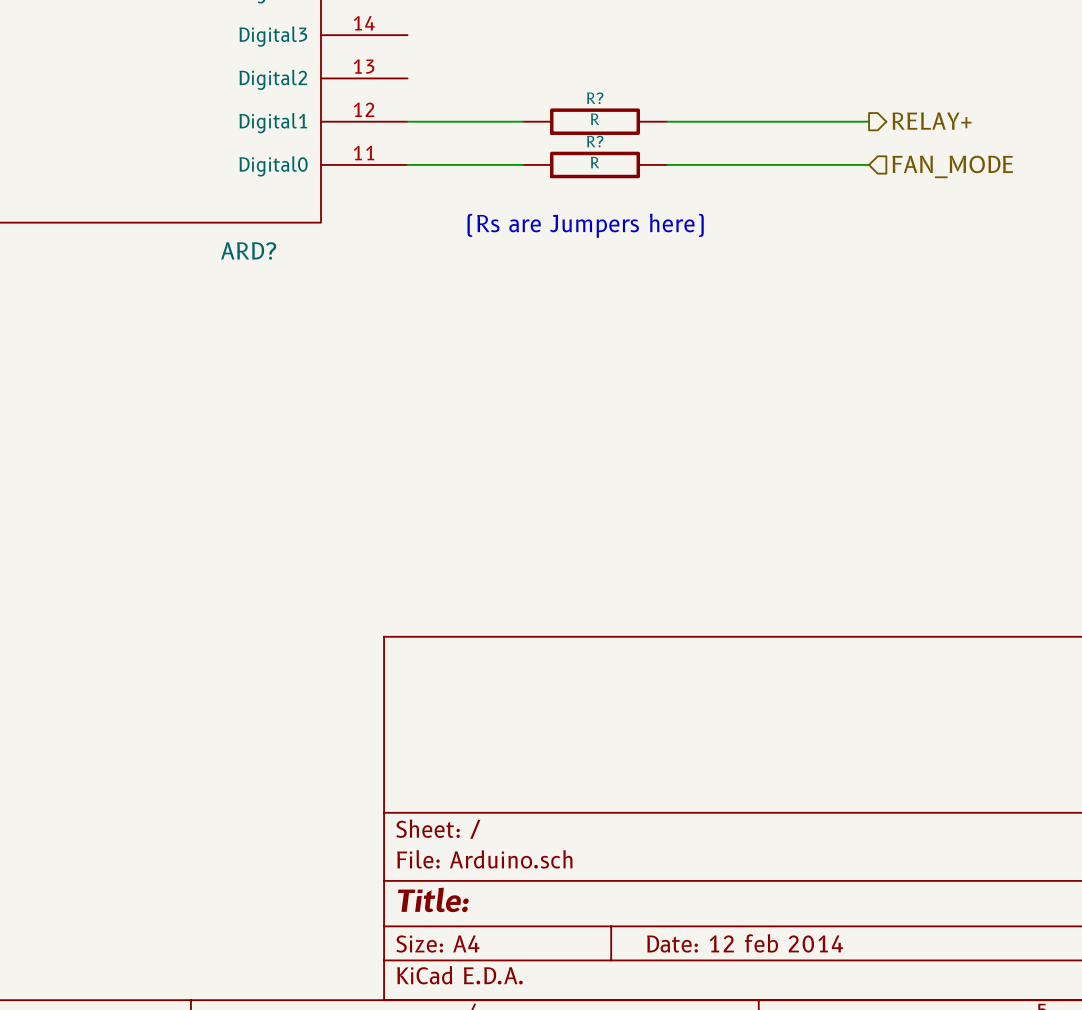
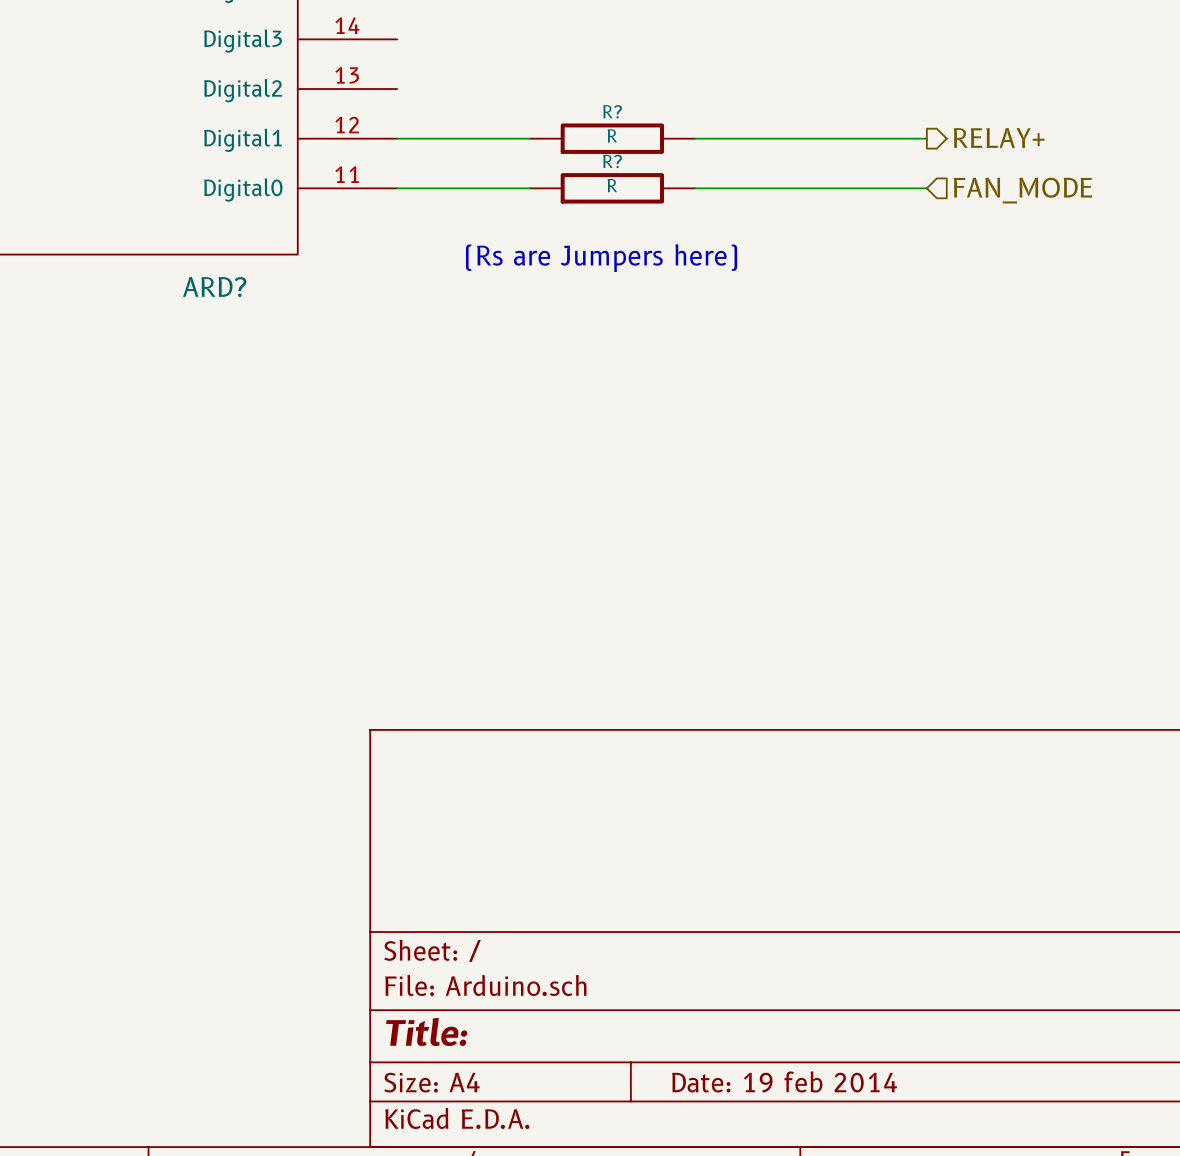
title block: Date: 12 feb 2014 (745, 943) -> Date: 19 feb 2014 (784, 1081)

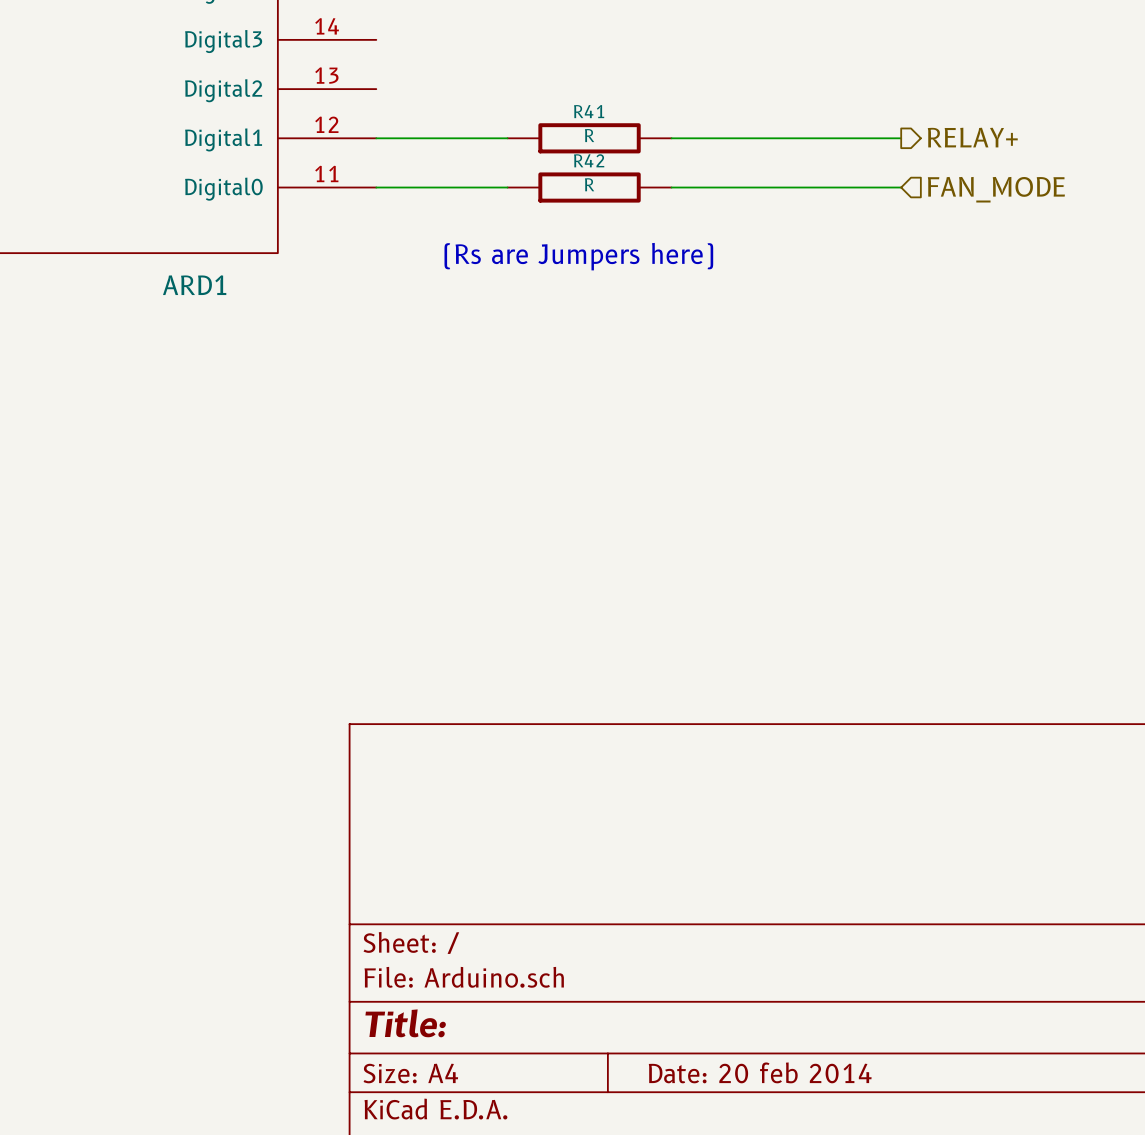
R? name: R? (612, 111) -> R41 (589, 111)
R? name: R? (612, 161) -> R42 (589, 160)
ARD? name: ARD? (214, 287) -> ARD1 (194, 285)
title block: Date: 19 feb 2014 (784, 1081) -> Date: 20 feb 2014 (760, 1072)

